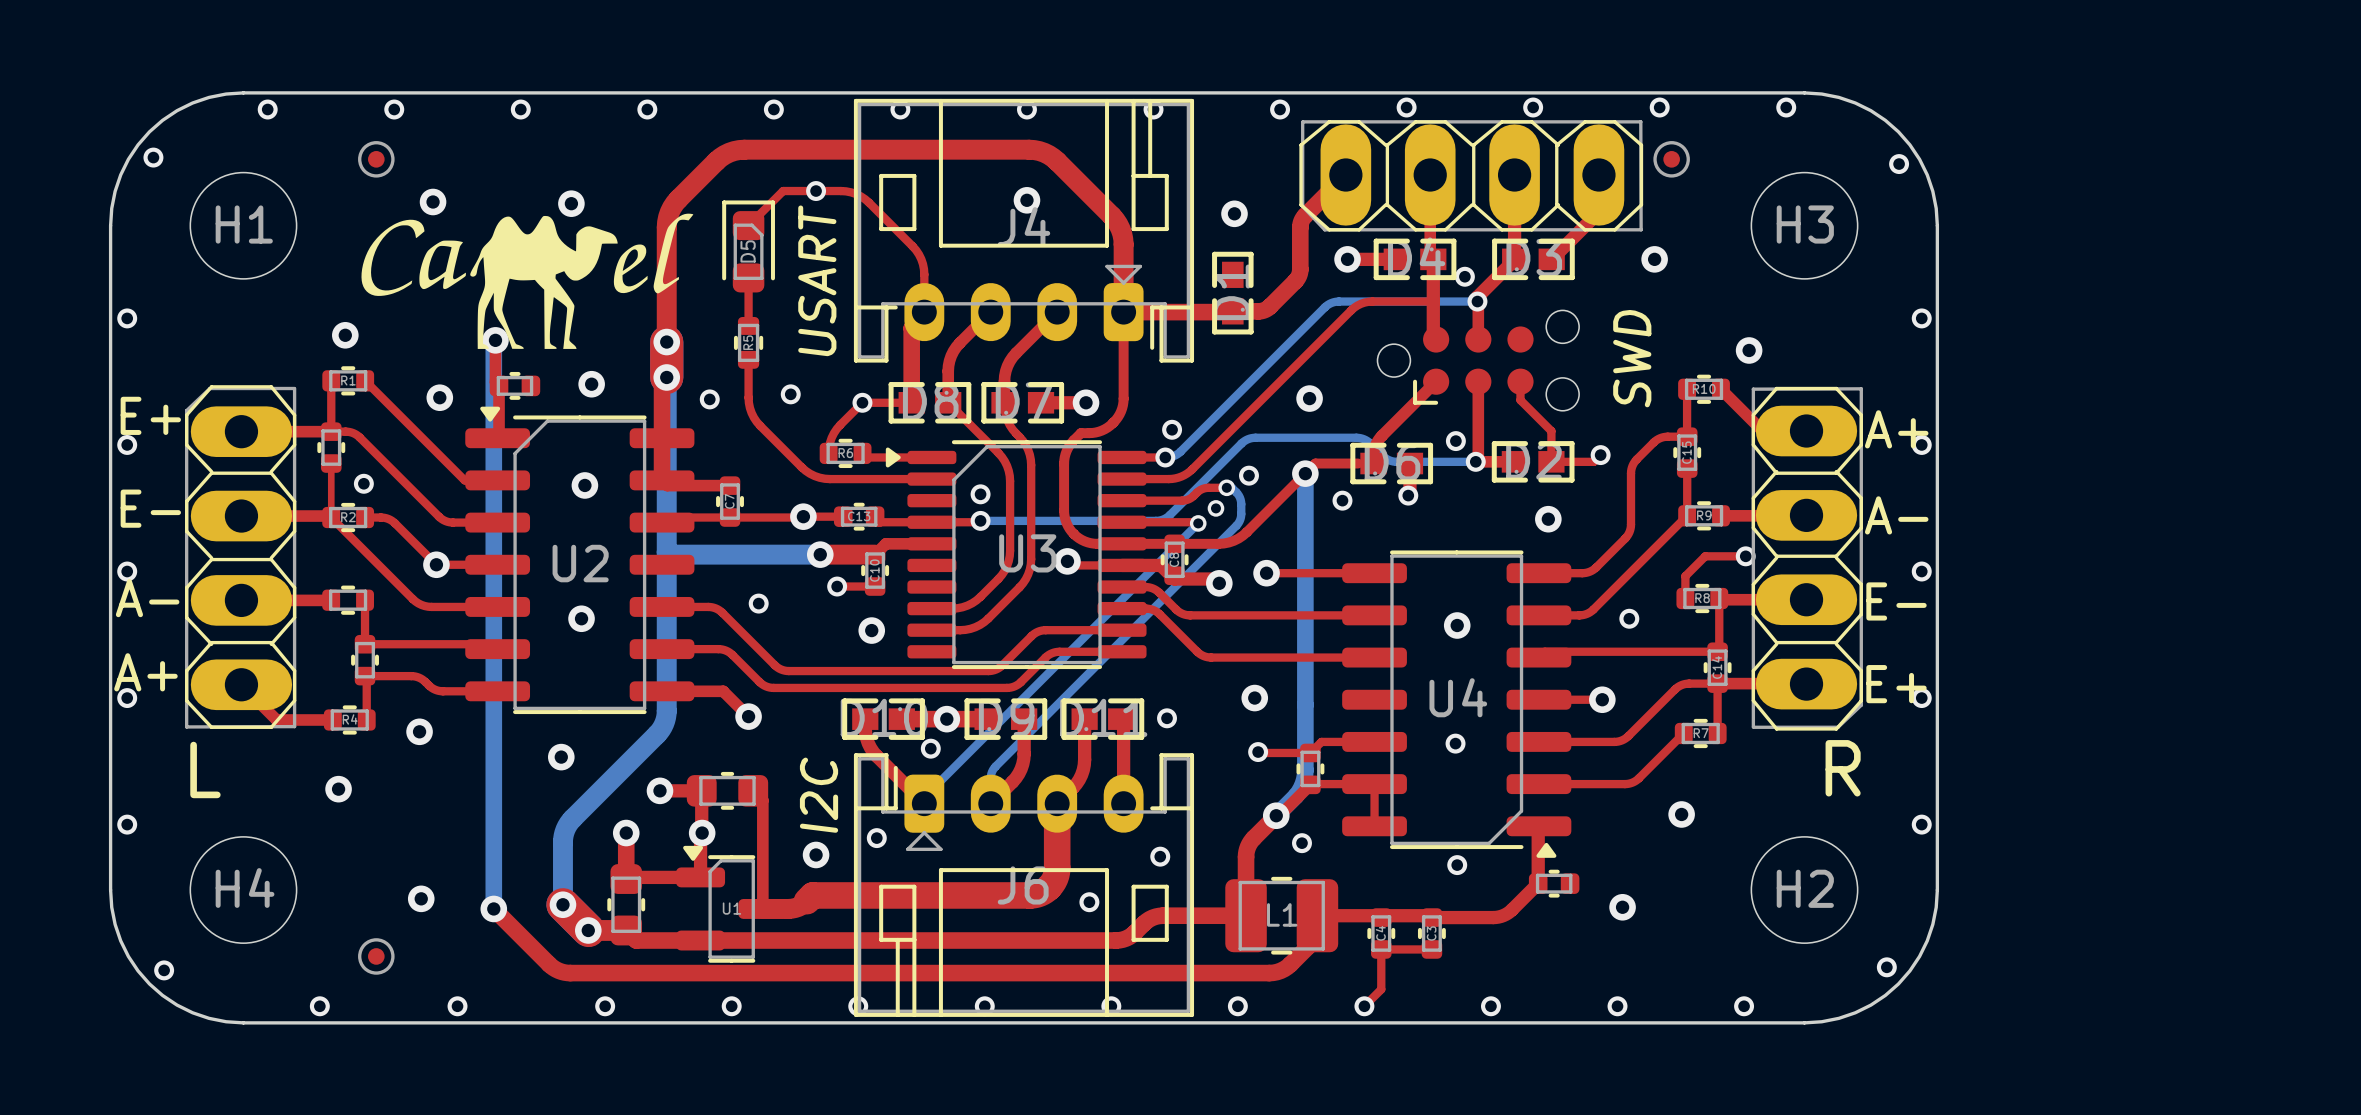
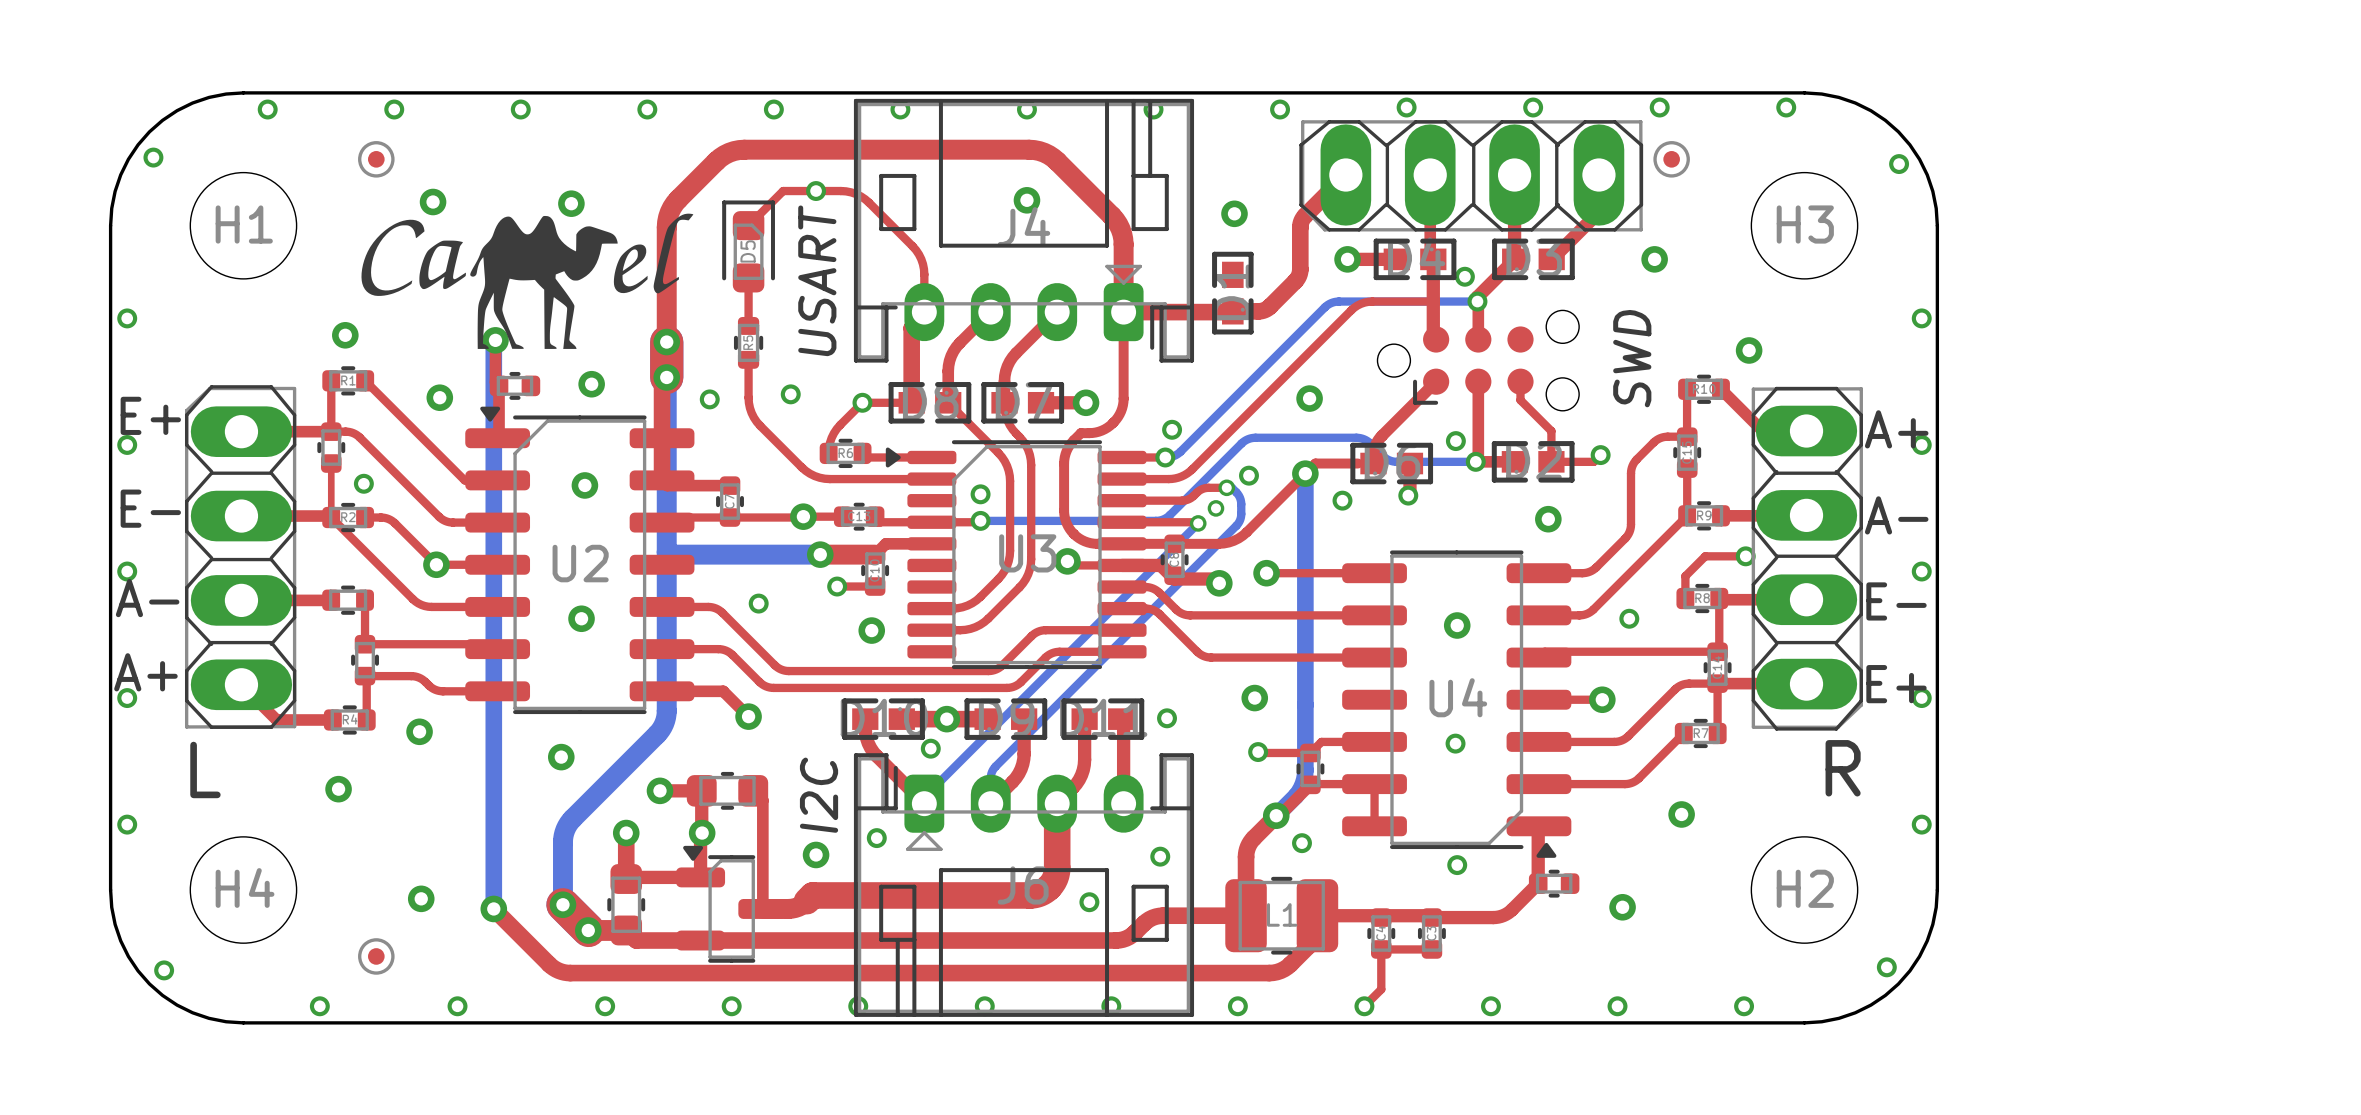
U1 name: U1 (731, 908) -> none

